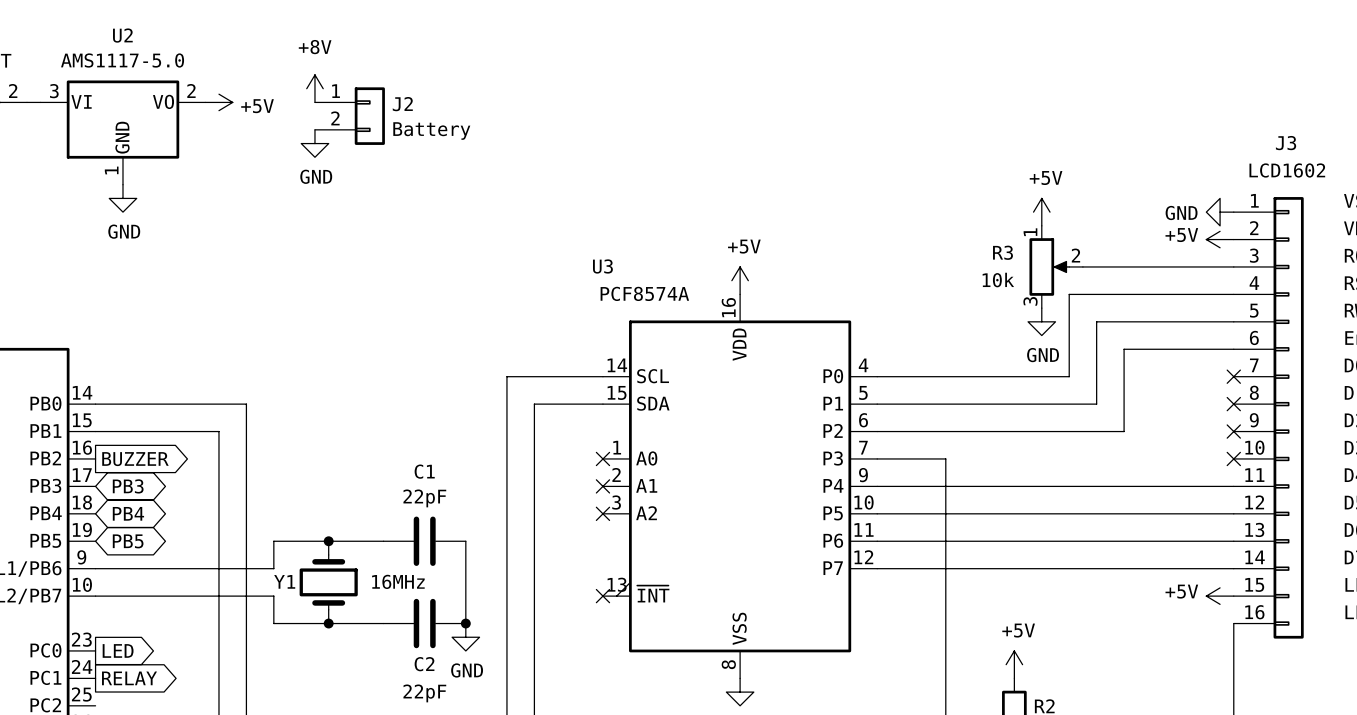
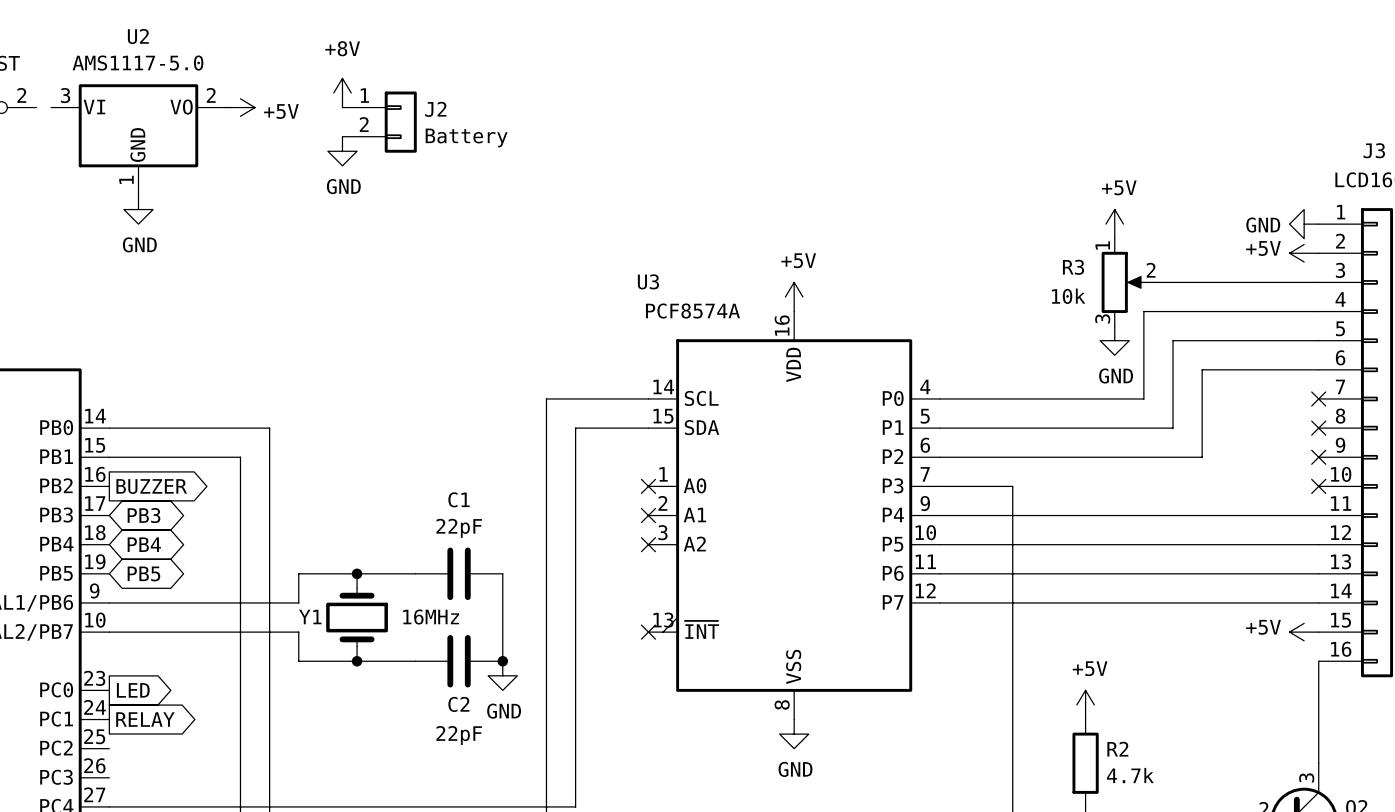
wire: (27, 102) (40, 102) -> none

